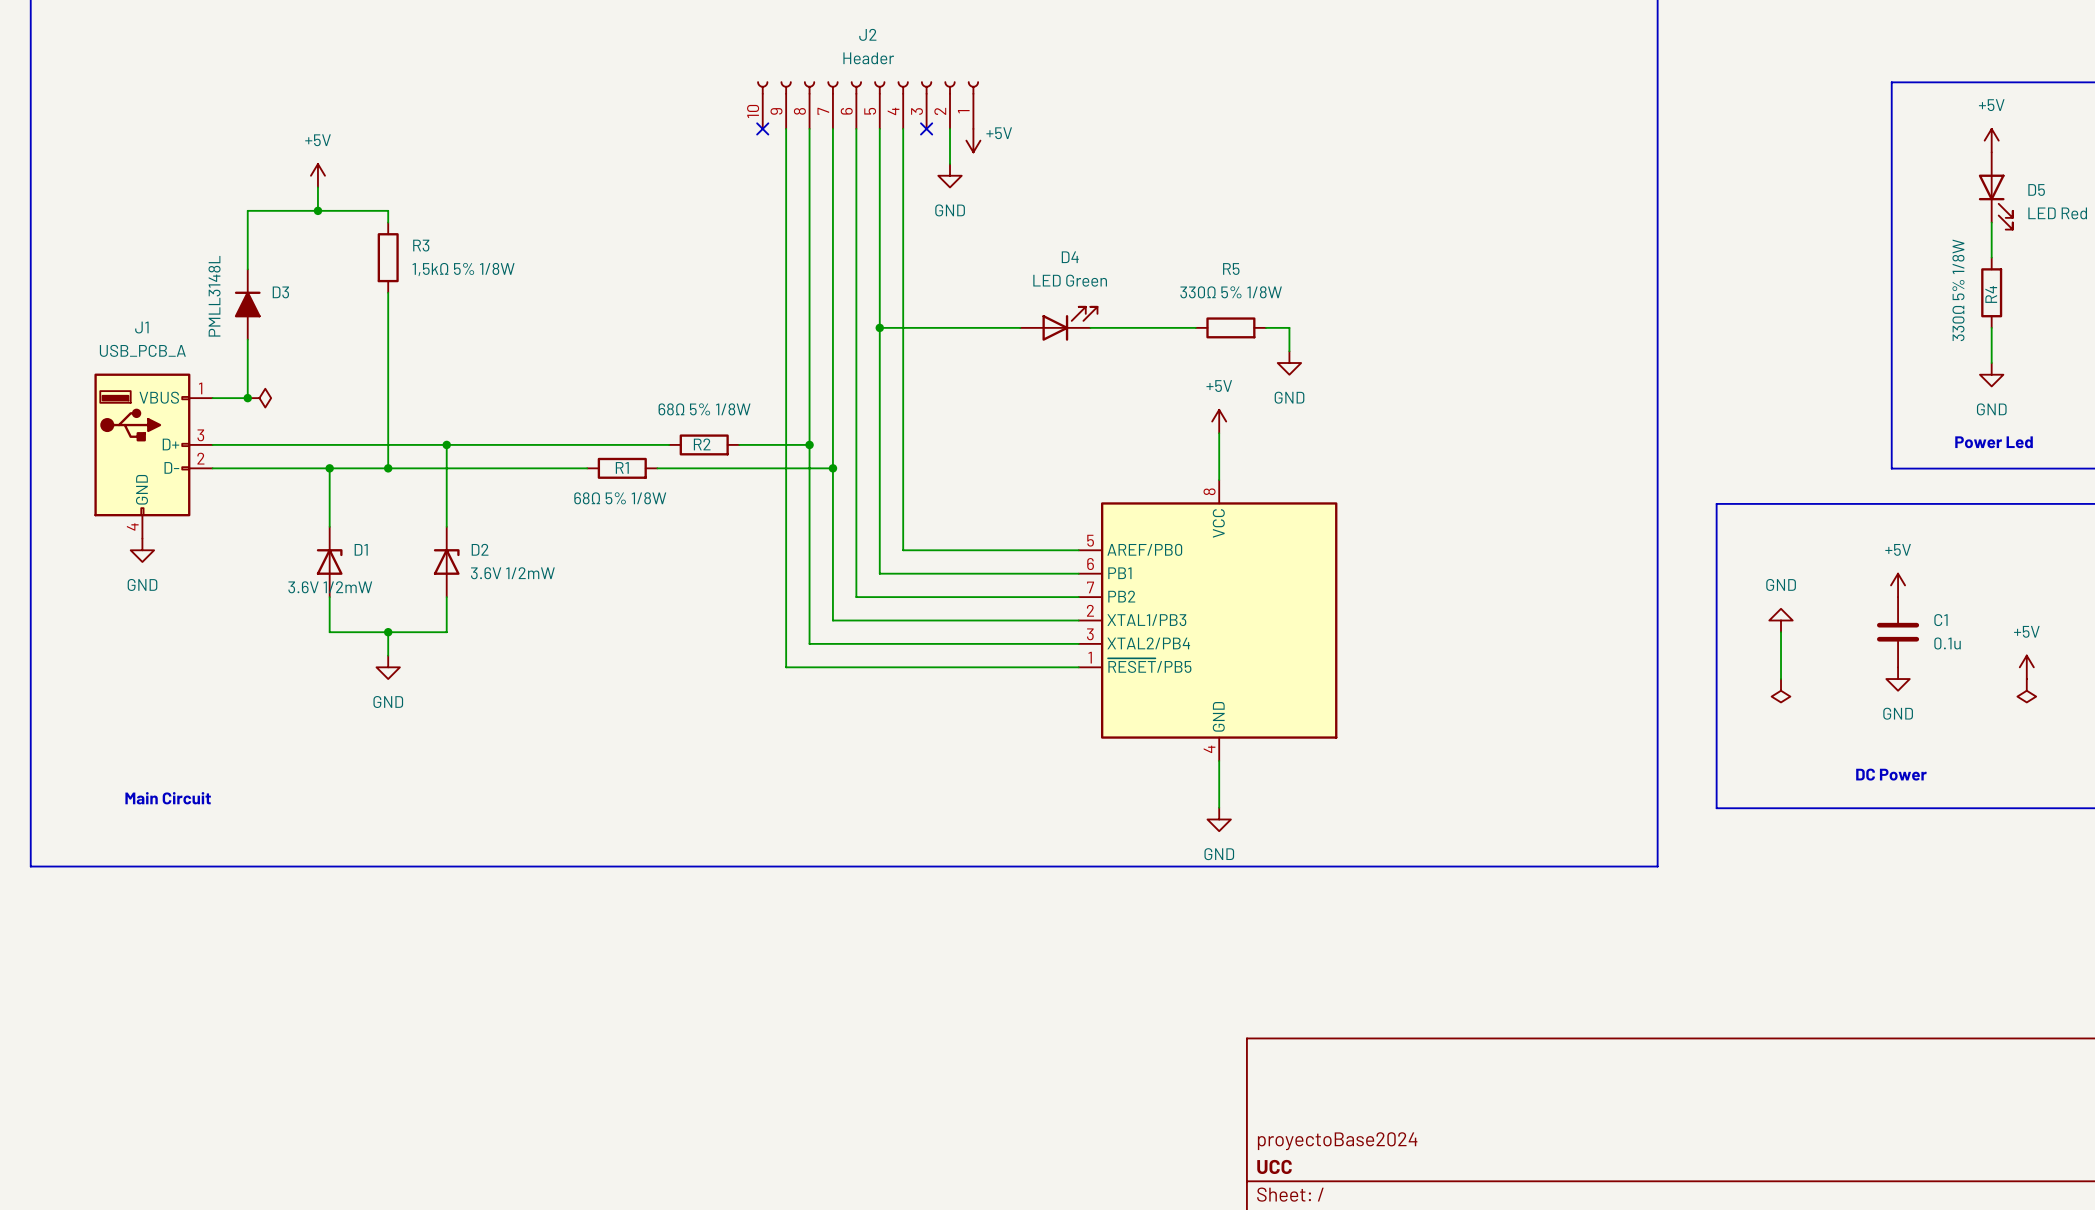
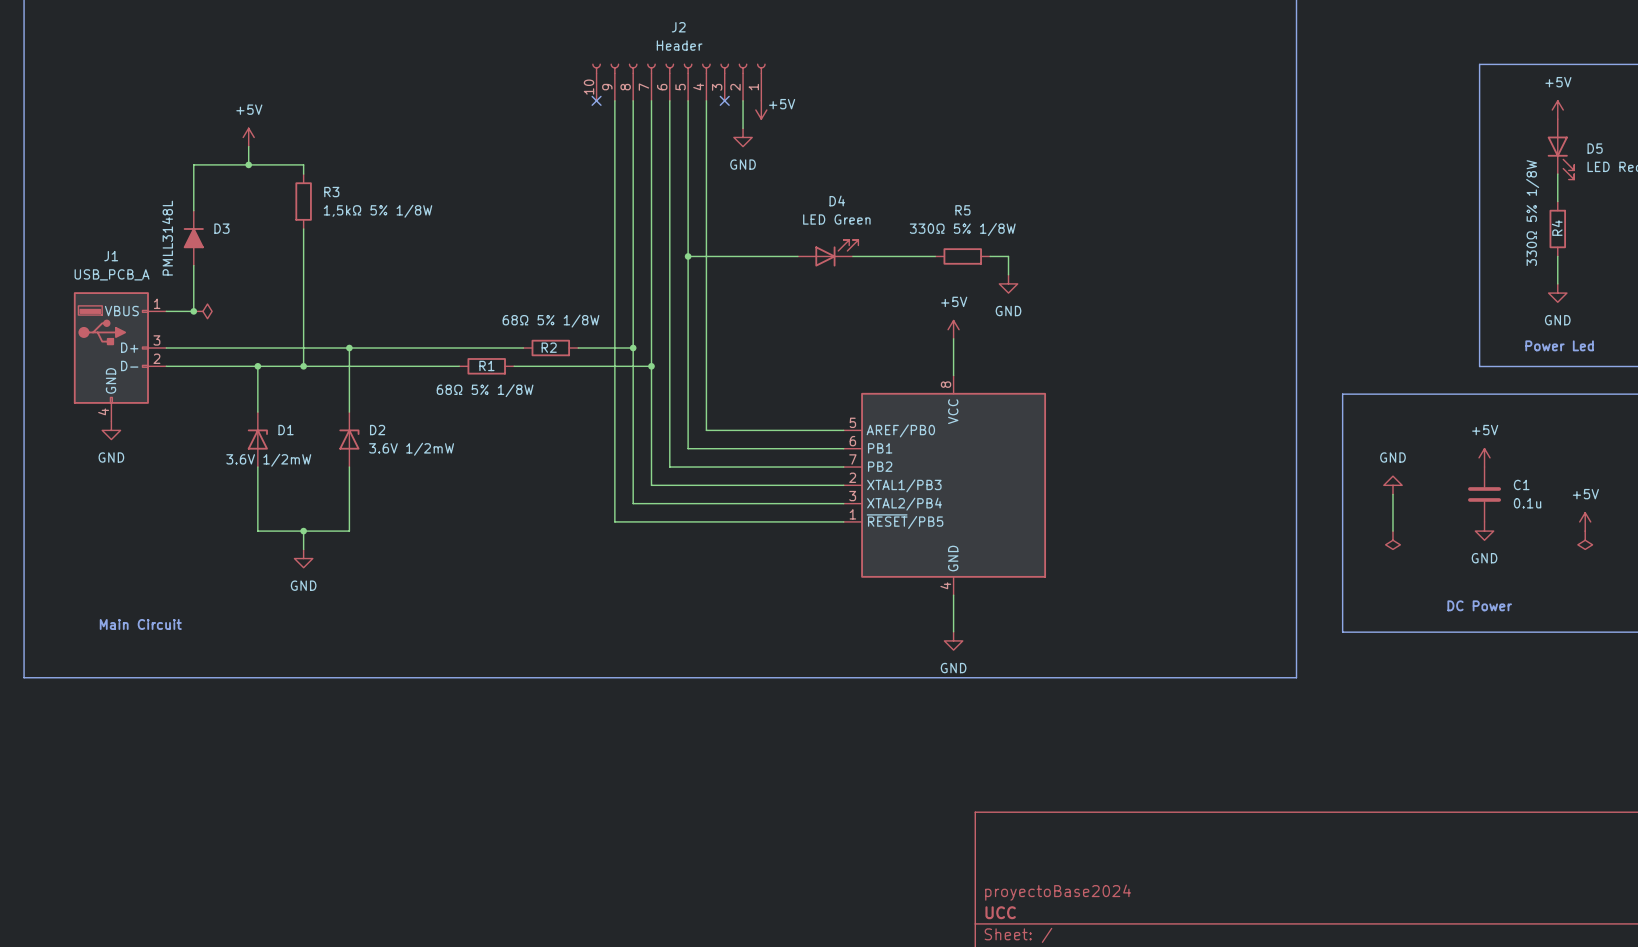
wire: (329, 632) (446, 632) -> (257, 494) (257, 531) (349, 531) (349, 494)
wire: (388, 632) (388, 655) -> (303, 531) (303, 549)
junction position: (388, 632) -> (303, 531)
power symbol position: GND (388, 667) -> GND (303, 558)

